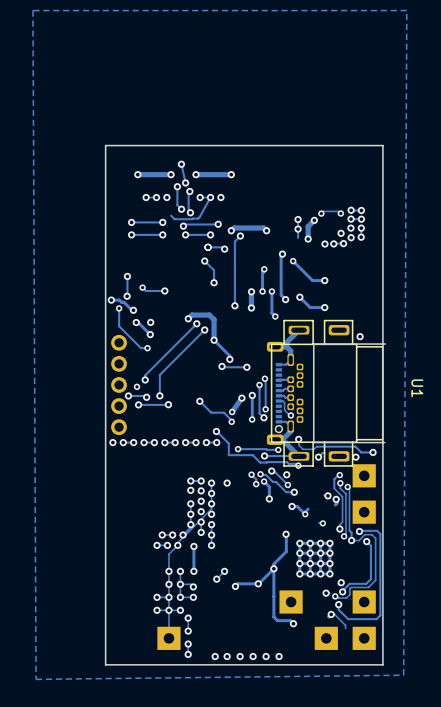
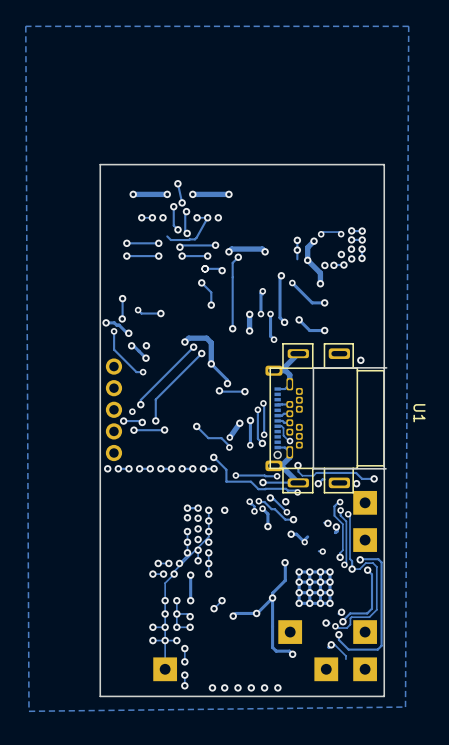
track: none -> (307, 260) (320, 273) (320, 283)
via: none -> (320, 283)

